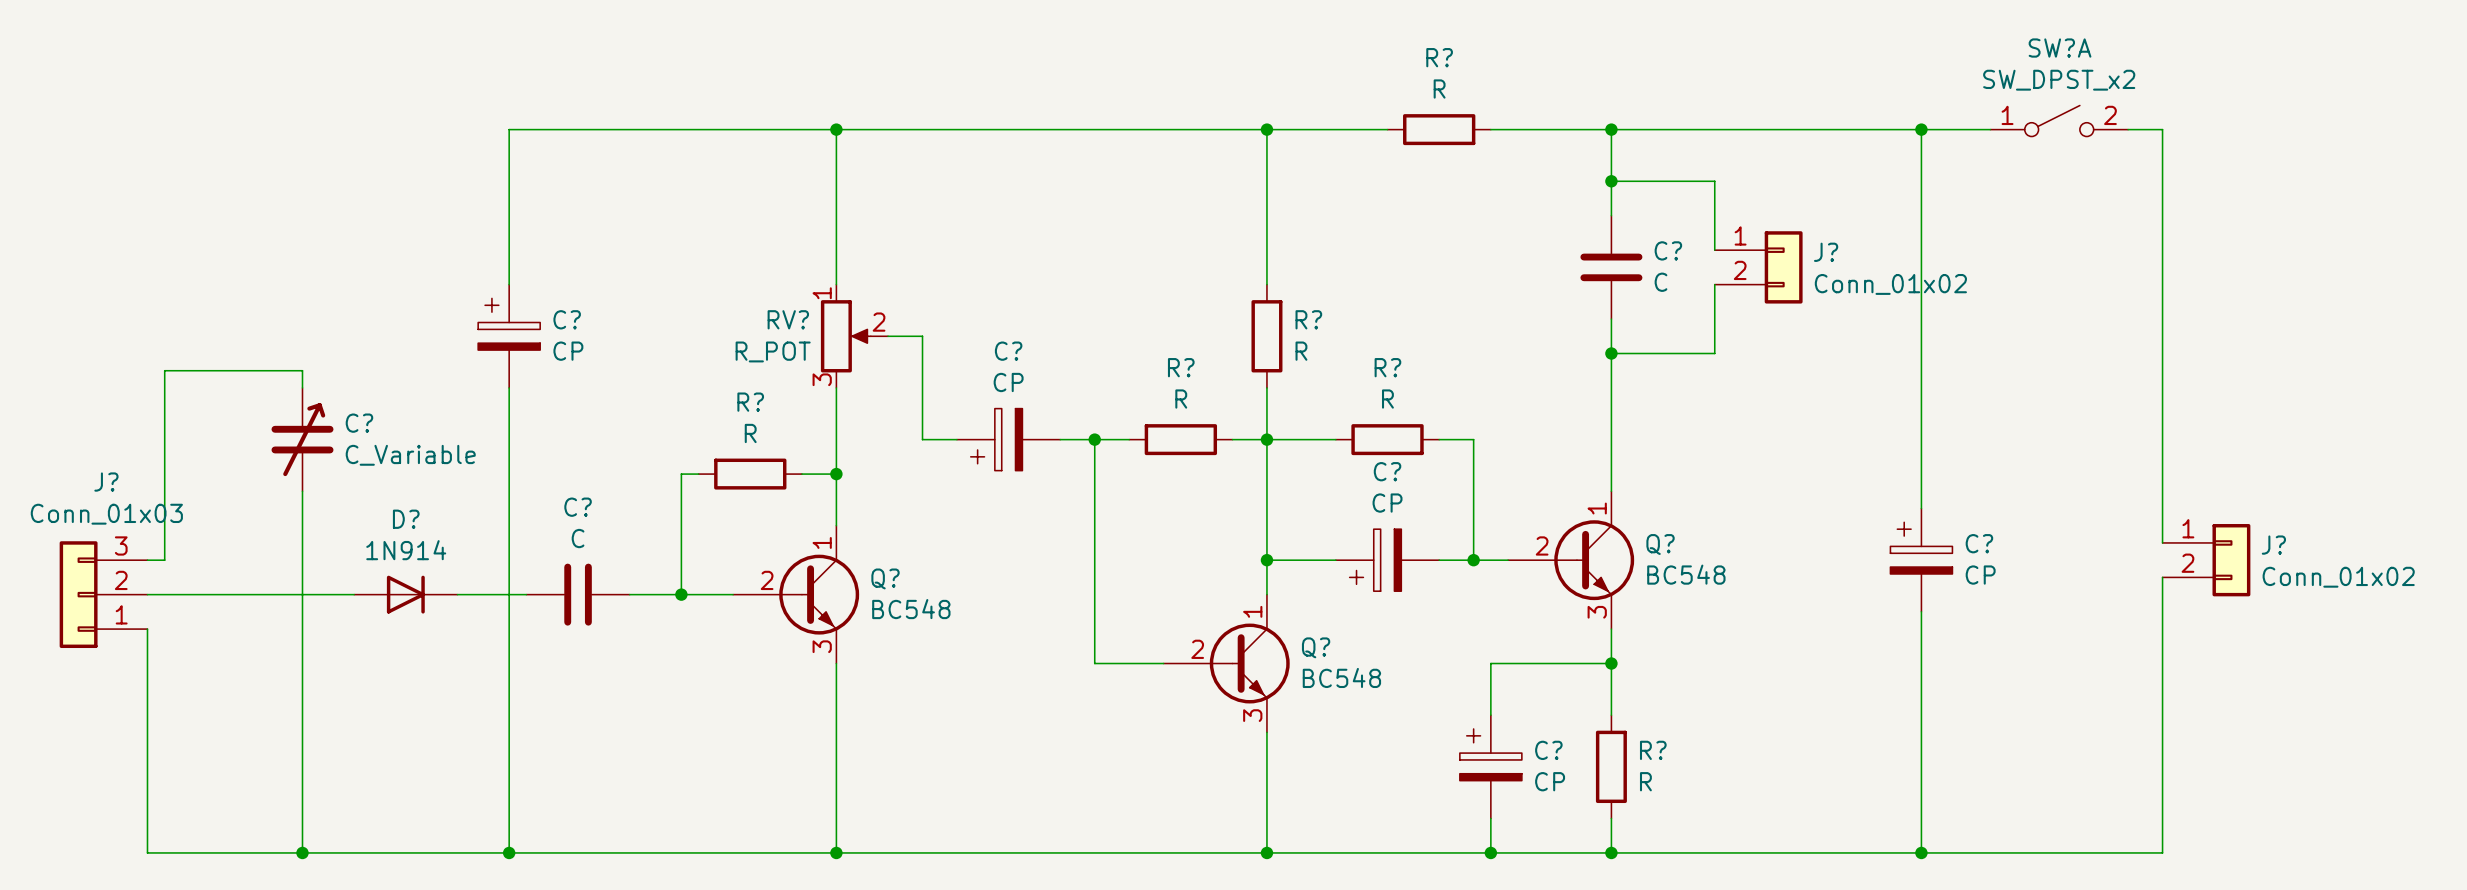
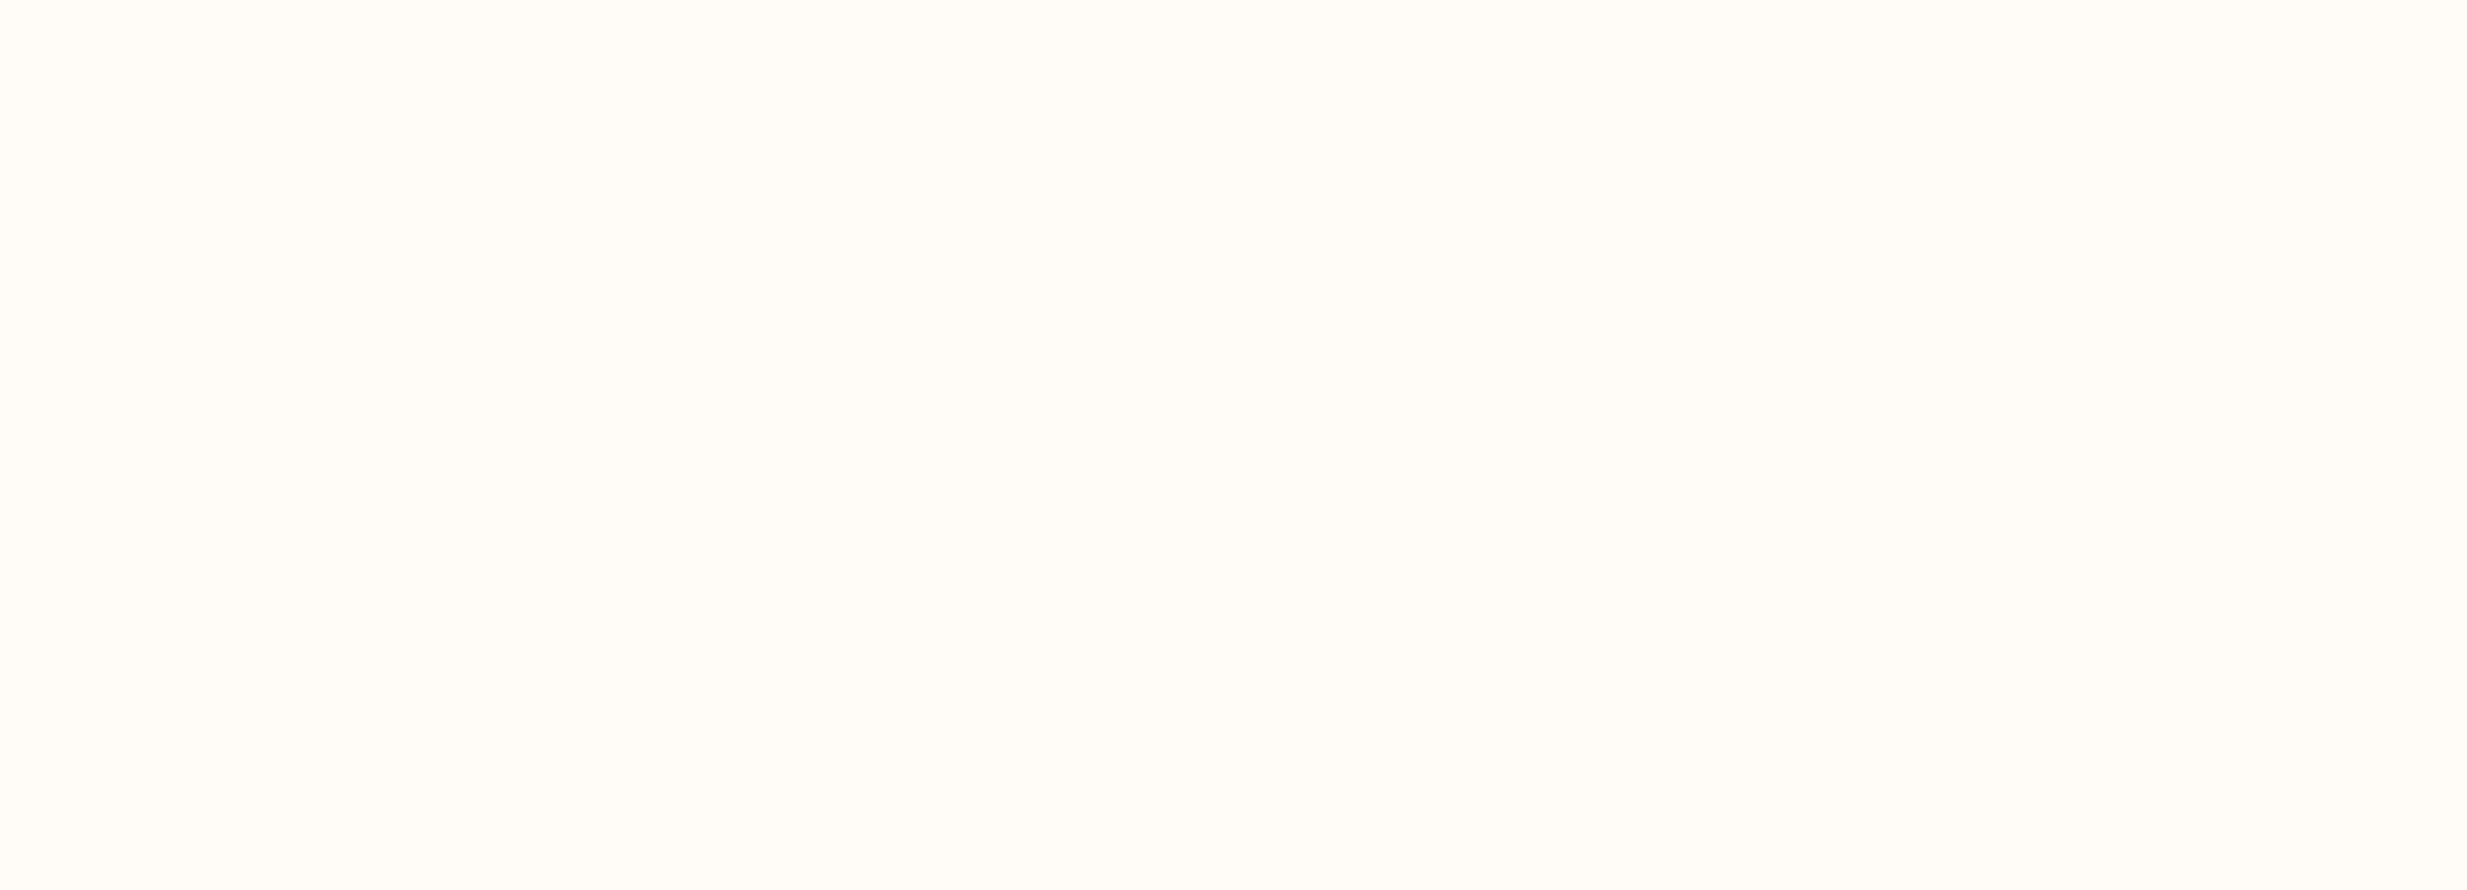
SW?A: SW_DPST_x2 (2059, 121) -> none
wire: (836, 129) (836, 284) -> none
junction: (836, 129) -> none
wire: (1266, 129) (1266, 284) -> none
junction: (1266, 129) -> none
wire: (1387, 129) (509, 129) (509, 284) -> none
R?: R (1439, 129) -> none
wire: (1490, 129) (1990, 129) -> none
wire: (1611, 129) (1611, 215) -> none
junction: (1611, 129) -> none
wire: (1921, 129) (1921, 508) -> none
junction: (1921, 129) -> none
wire: (2128, 129) (2162, 129) (2162, 542) -> none
wire: (1611, 181) (1714, 181) (1714, 250) -> none
junction: (1611, 181) -> none
C?: C (1611, 267) -> none
J?: Conn_01x02 (1758, 267) -> none
wire: (1714, 284) (1714, 353) (1611, 353) -> none
wire: (1611, 319) (1611, 491) -> none
C?: CP (509, 336) -> none
RV?: R_POT (854, 336) -> none
wire: (888, 336) (922, 336) (922, 439) (956, 439) -> none
R?: R (1266, 336) -> none
junction: (1611, 353) -> none
wire: (302, 387) (302, 370) (164, 370) (164, 560) (147, 560) -> none
wire: (509, 387) (509, 852) -> none
wire: (836, 387) (836, 525) -> none
wire: (1266, 387) (1266, 594) -> none
C?: C_Variable (302, 439) -> none
C?: CP (1008, 439) -> none
wire: (1060, 439) (1129, 439) -> none
wire: (1094, 439) (1094, 663) (1163, 663) -> none
junction: (1094, 439) -> none
R?: R (1180, 439) -> none
wire: (1232, 439) (1335, 439) -> none
junction: (1266, 439) -> none
R?: R (1387, 439) -> none
wire: (1439, 439) (1473, 439) (1473, 560) -> none
wire: (698, 474) (681, 474) (681, 594) -> none
R?: R (750, 474) -> none
wire: (801, 474) (836, 474) -> none
junction: (836, 474) -> none
wire: (302, 491) (302, 852) -> none
wire: (1266, 560) (1335, 560) -> none
junction: (1266, 560) -> none
C?: CP (1387, 560) -> none
wire: (1439, 560) (1508, 560) -> none
junction: (1473, 560) -> none
Q?: BC548 (1571, 560) -> none
C?: CP (1921, 560) -> none
J?: Conn_01x02 (2206, 560) -> none
wire: (2162, 577) (2162, 852) (147, 852) (147, 629) -> none
J?: Conn_01x03 (103, 594) -> none
wire: (147, 594) (354, 594) -> none
D?: 1N914 (405, 594) -> none
wire: (457, 594) (526, 594) -> none
C?: C (578, 594) -> none
wire: (629, 594) (733, 594) -> none
junction: (681, 594) -> none
Q?: BC548 (796, 594) -> none
wire: (1921, 611) (1921, 852) -> none
wire: (1611, 629) (1611, 715) -> none
wire: (836, 663) (836, 852) -> none
Q?: BC548 (1226, 663) -> none
wire: (1611, 663) (1490, 663) (1490, 715) -> none
junction: (1611, 663) -> none
wire: (1266, 732) (1266, 852) -> none
C?: CP (1490, 766) -> none
R?: R (1611, 766) -> none
wire: (1490, 818) (1490, 852) -> none
wire: (1611, 818) (1611, 852) -> none
junction: (302, 852) -> none
junction: (509, 852) -> none
junction: (836, 852) -> none
junction: (1266, 852) -> none
junction: (1490, 852) -> none
junction: (1611, 852) -> none
junction: (1921, 852) -> none

